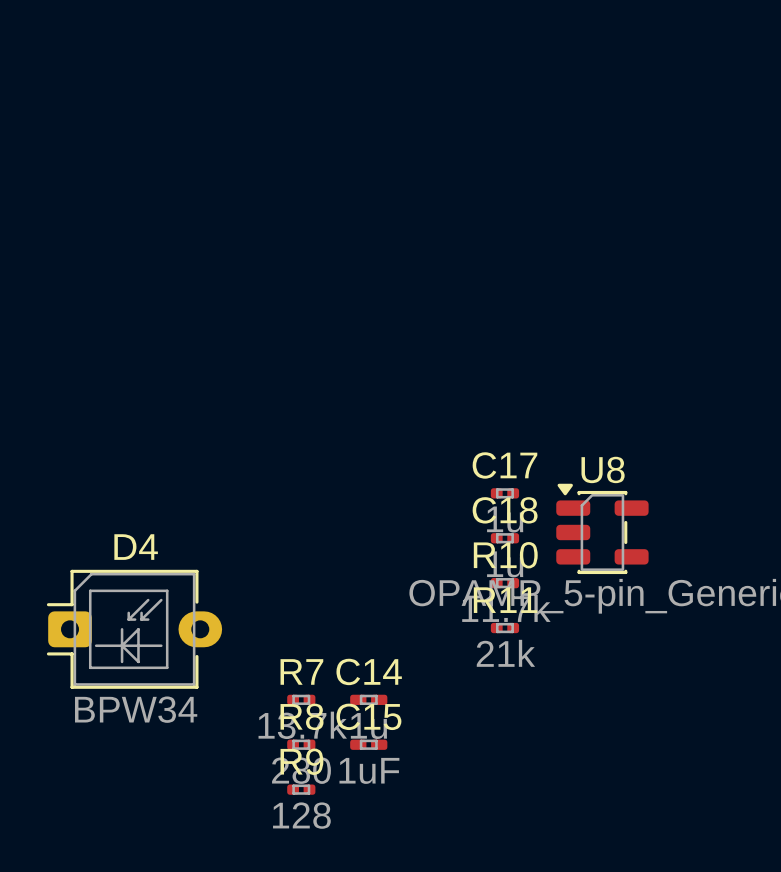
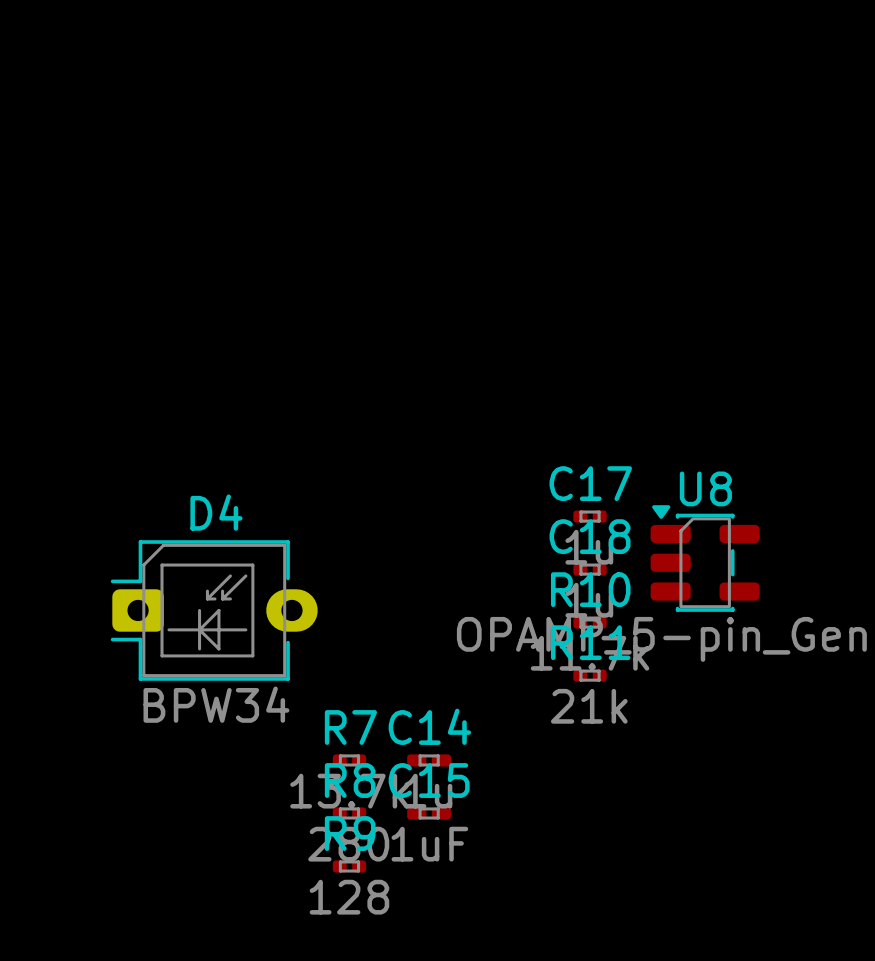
D4 position: (134, 629) -> (214, 610)

